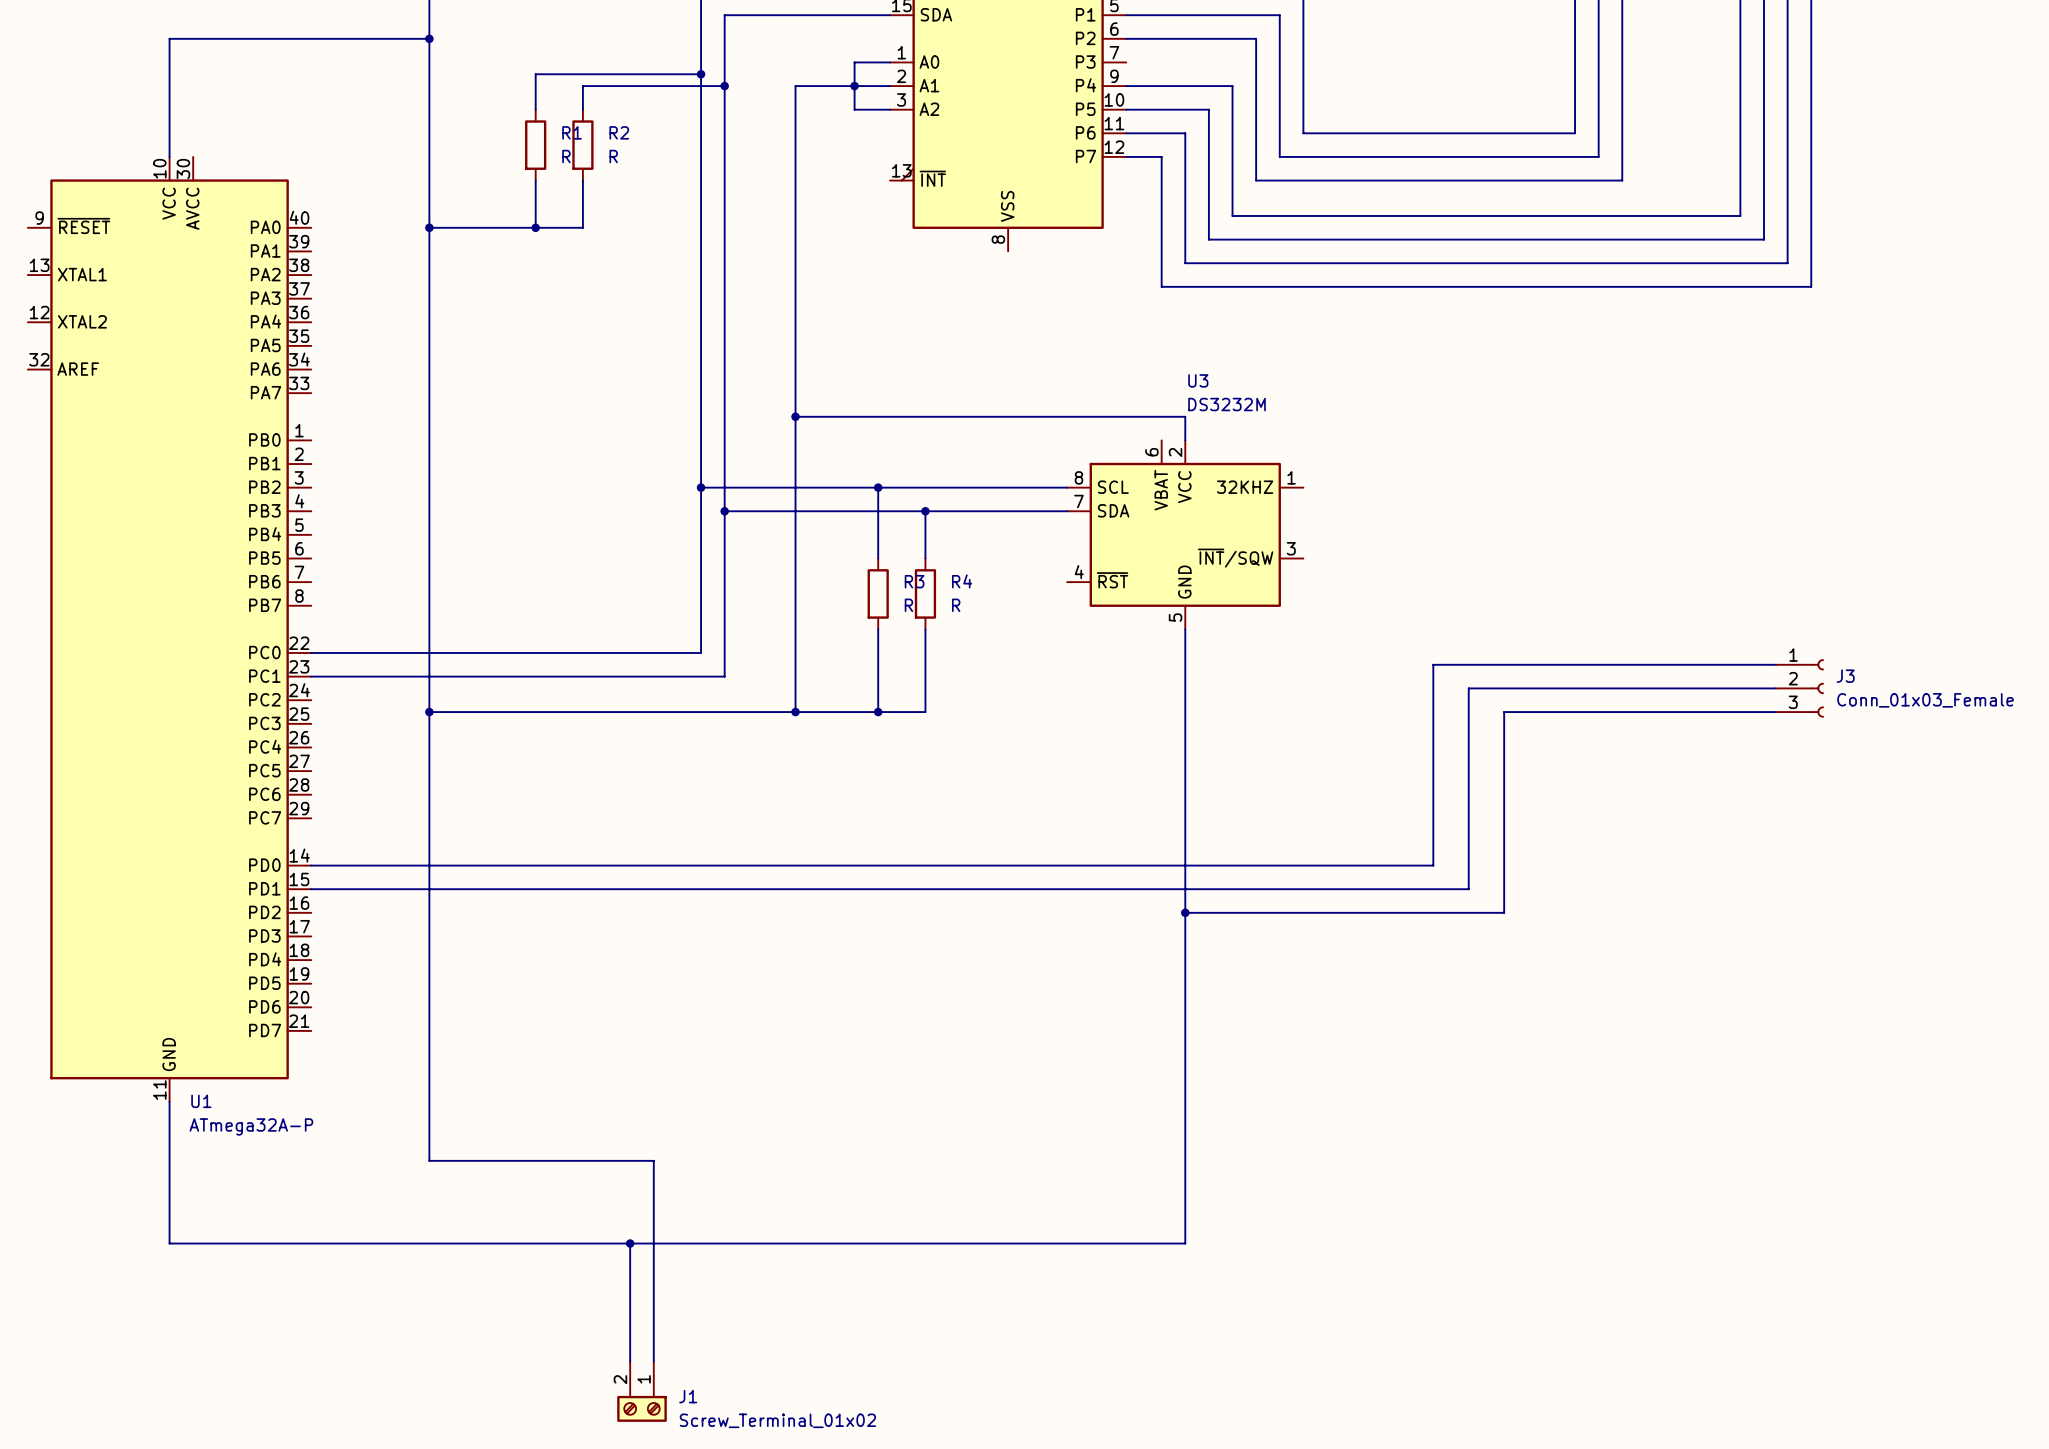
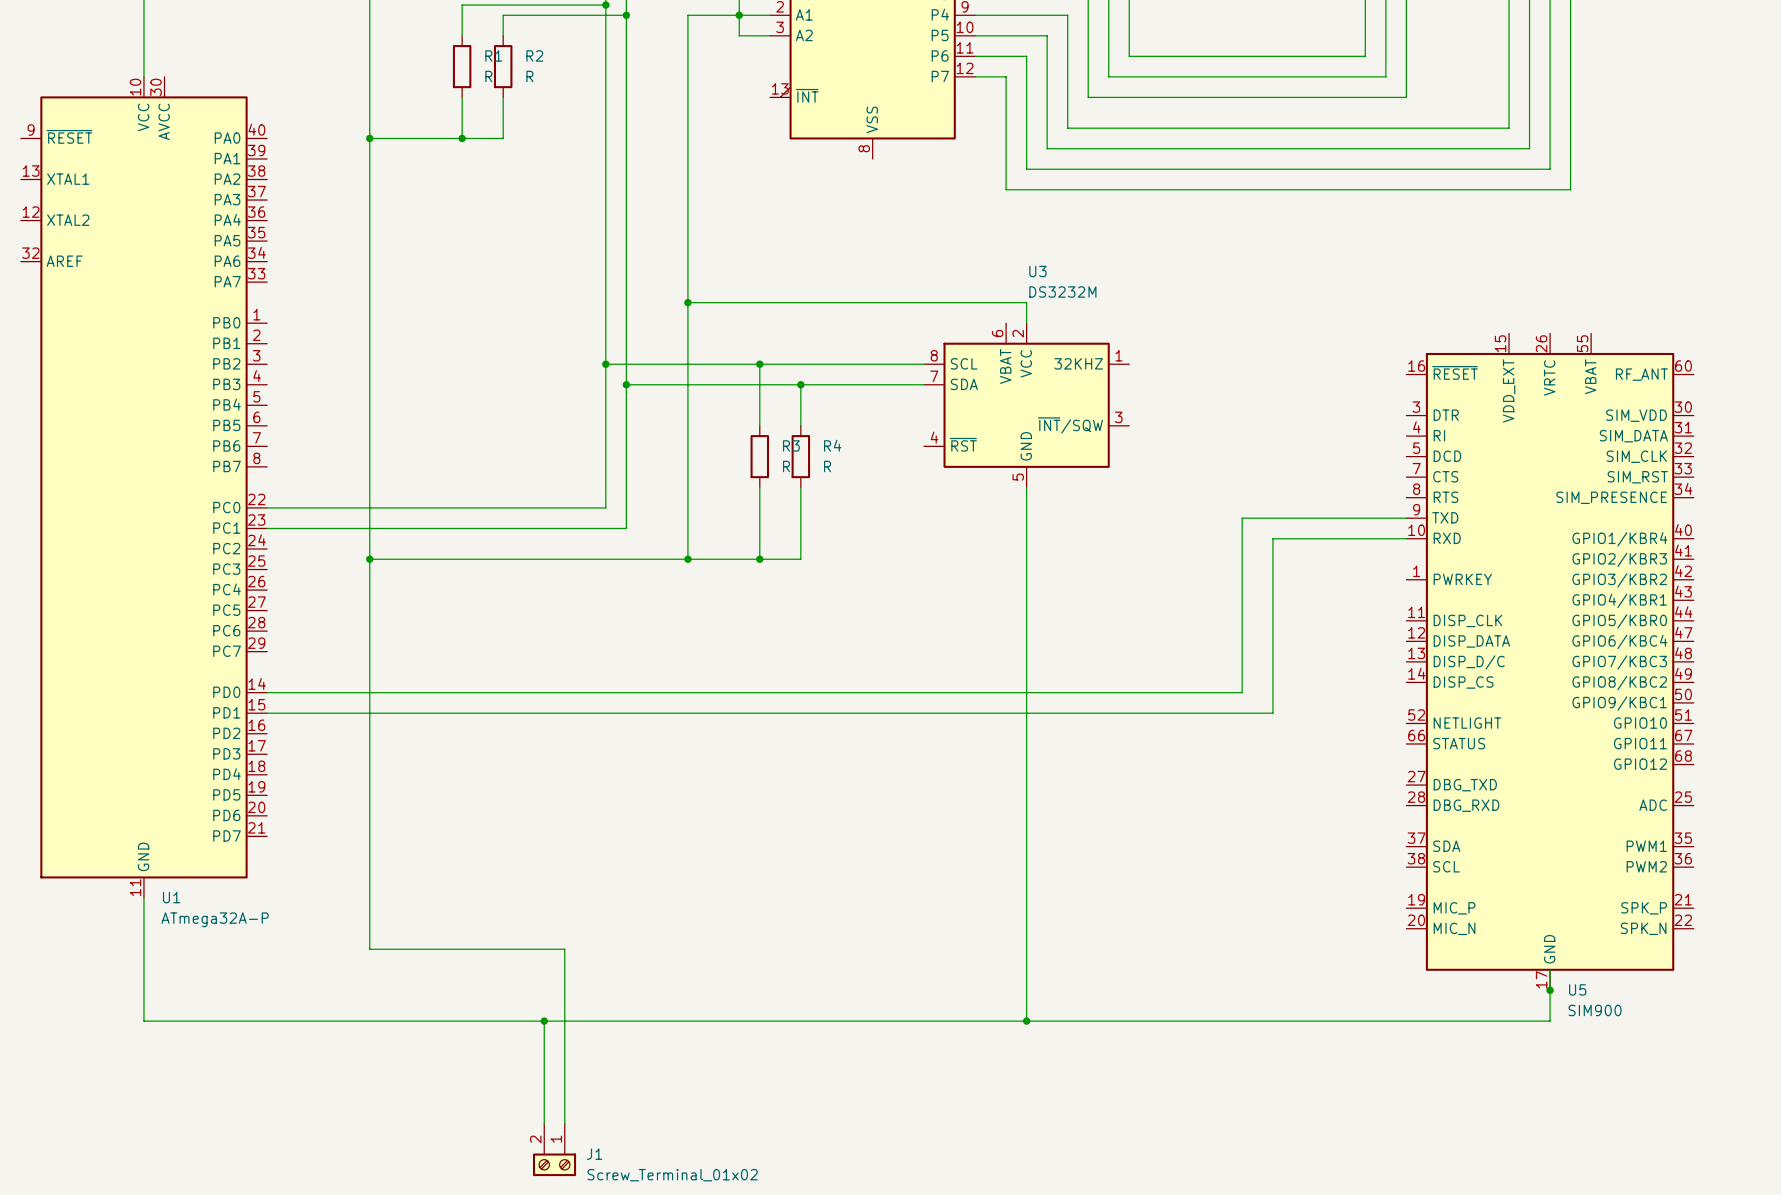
J3: Conn_01x03_Female (1799, 688) -> none
wire: (1775, 712) (1504, 712) (1504, 912) (1185, 912) -> none
U5: none -> SIM900 (1550, 661)
junction: (1185, 912) -> none
wire: none -> (1550, 969) (1550, 1021) (1026, 1021)
junction: none -> (1550, 990)
junction: none -> (1026, 1021)

